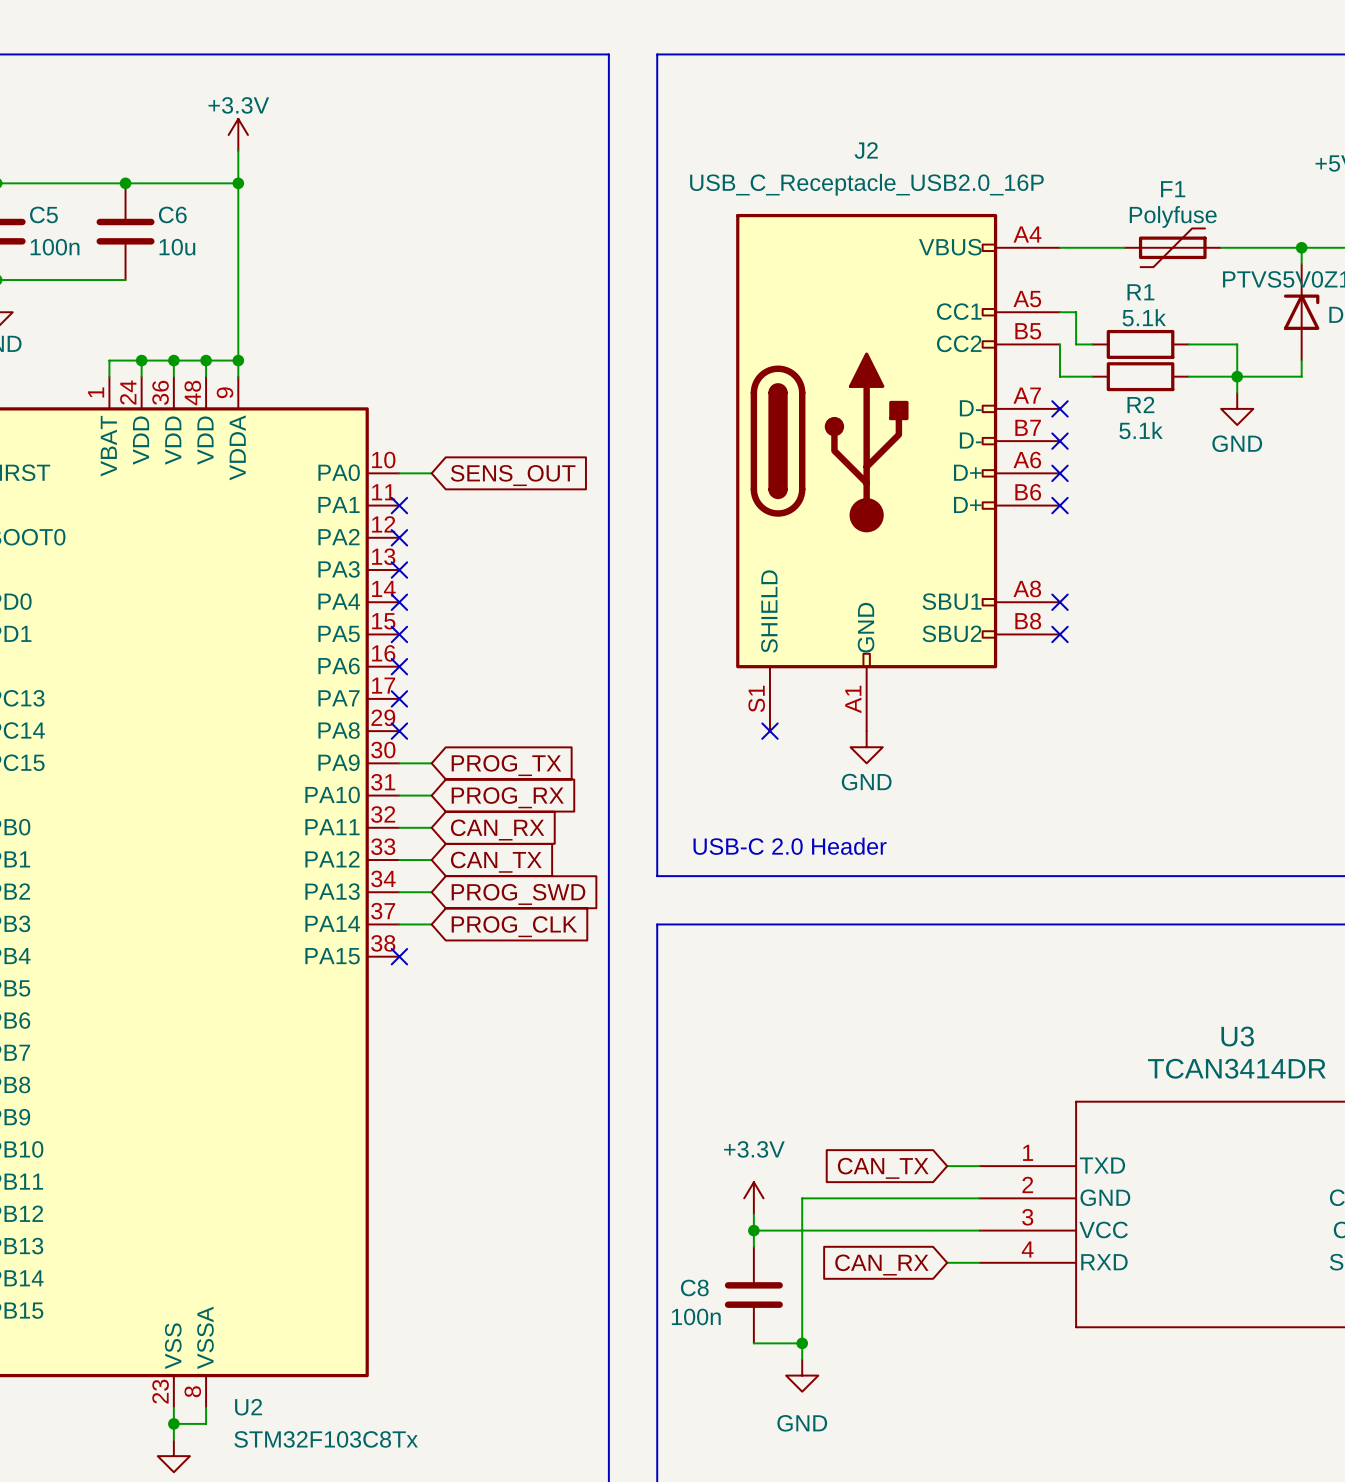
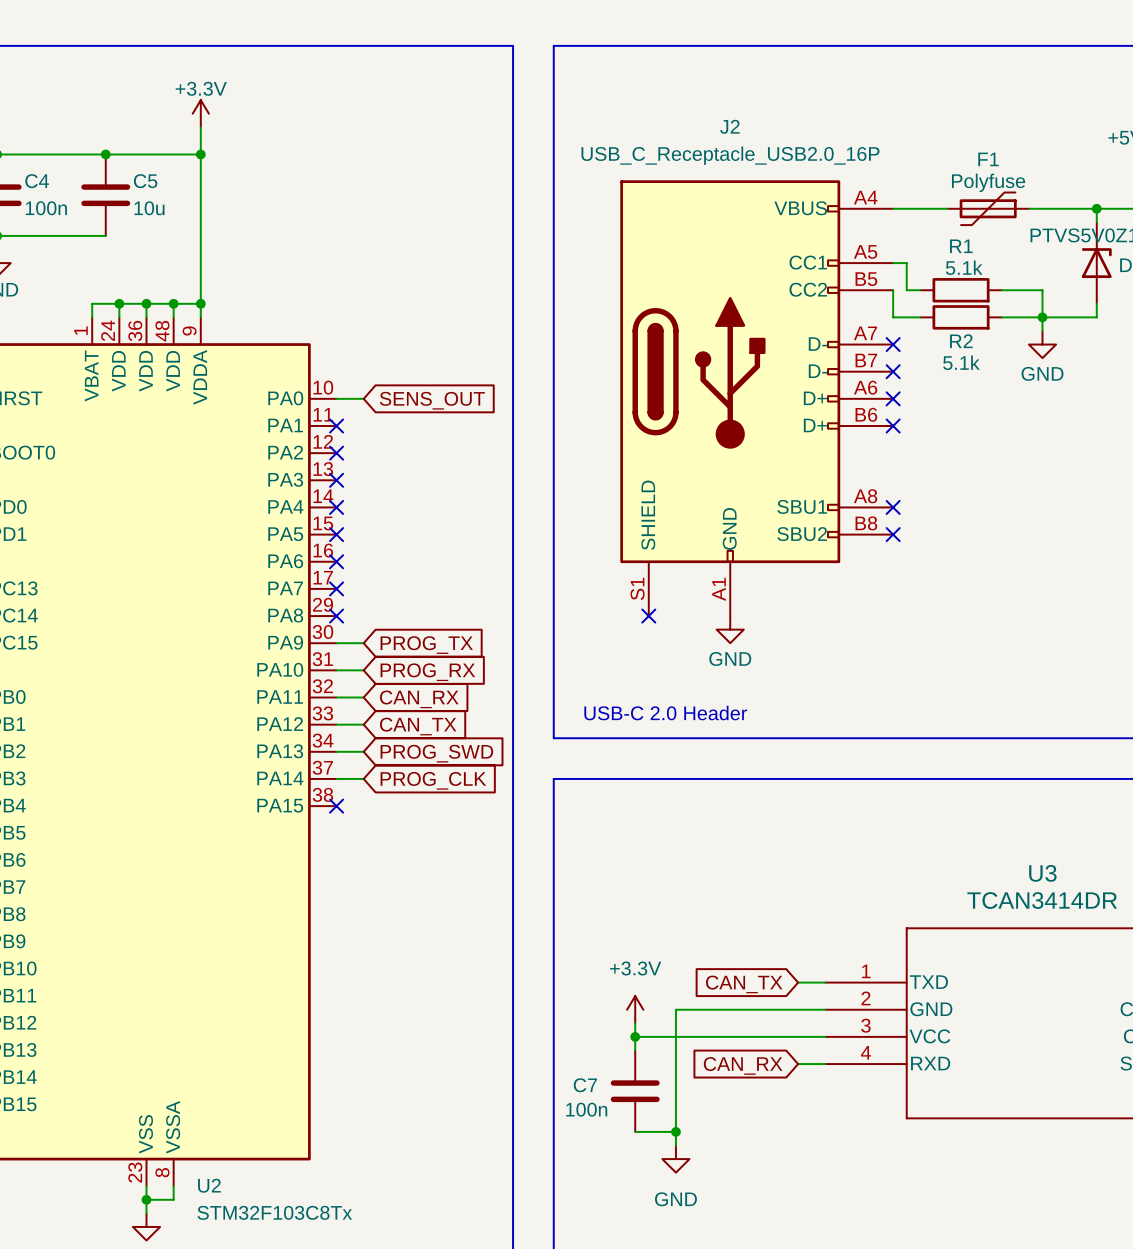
C5 name: C5 (43, 214) -> C4 (37, 181)
C6 name: C6 (172, 214) -> C5 (145, 181)
C8 name: C8 (694, 1287) -> C7 (585, 1085)

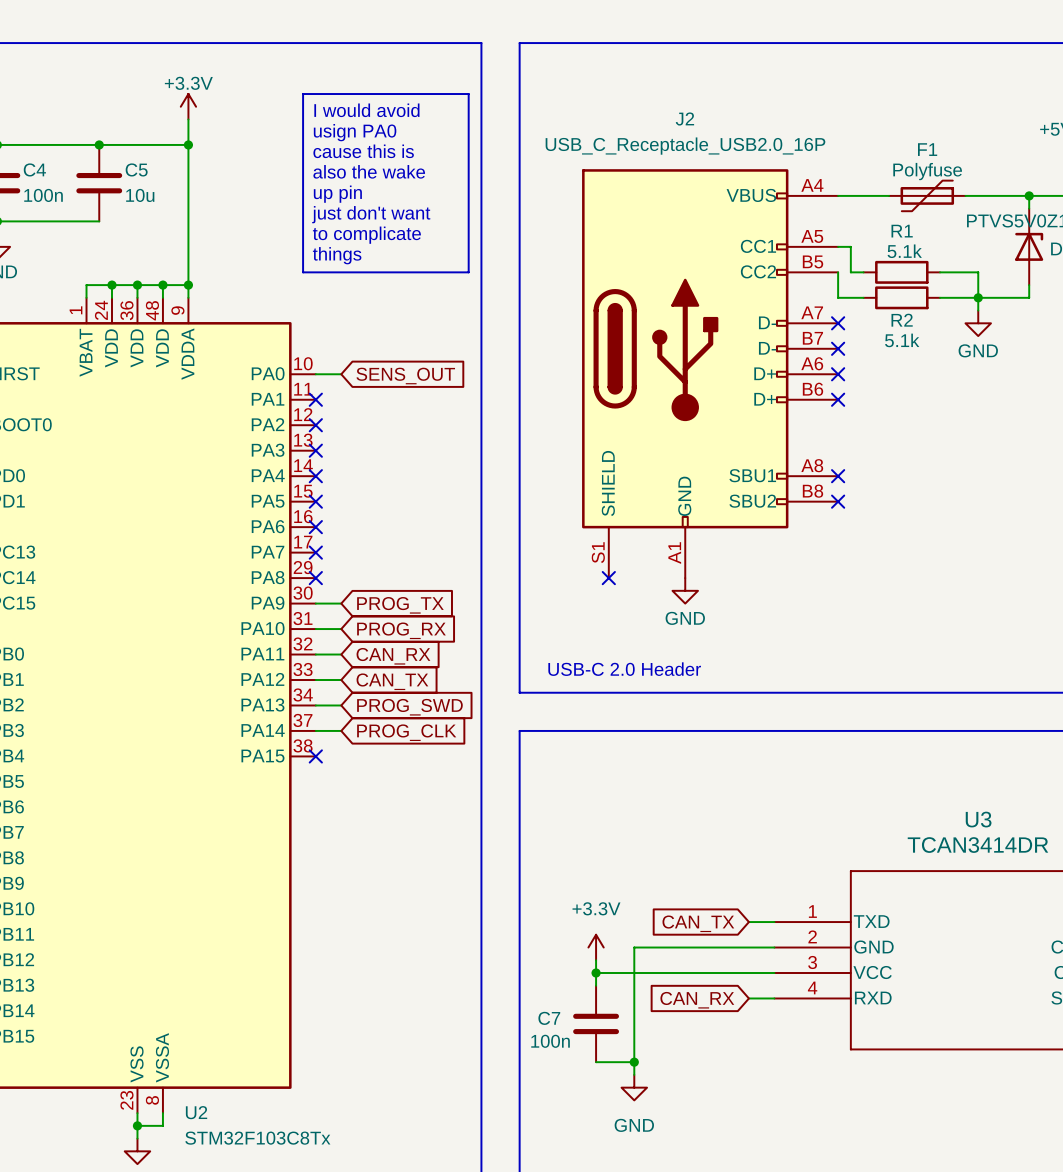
line: none -> (303, 94) (468, 94) (468, 272) (303, 272) (303, 94)
text: none -> I would avoid (366, 110)
text: none -> usign PA0 (355, 132)
text: none -> cause this is (363, 151)
text: none -> also the wake (369, 171)
text: none -> up pin (337, 194)
text: none -> just don't want (371, 214)
text: none -> to complicate (366, 235)
text: none -> things (337, 255)

